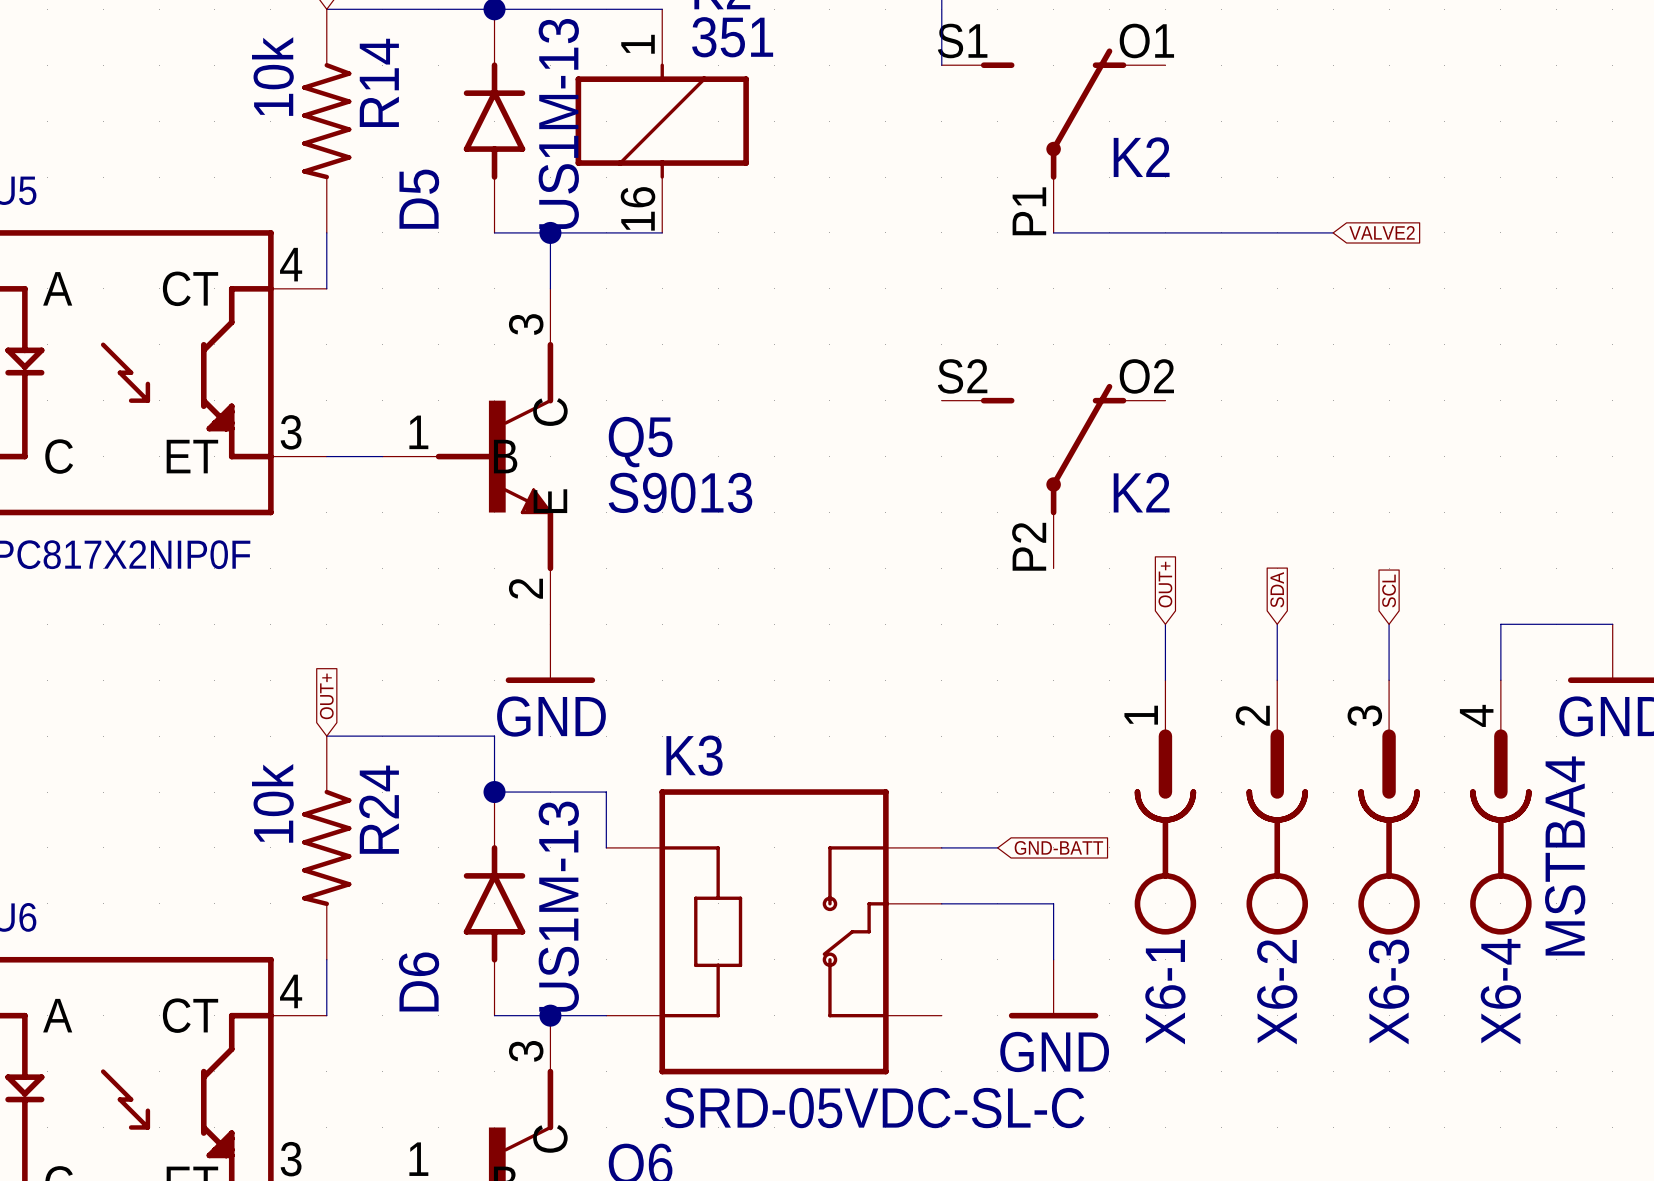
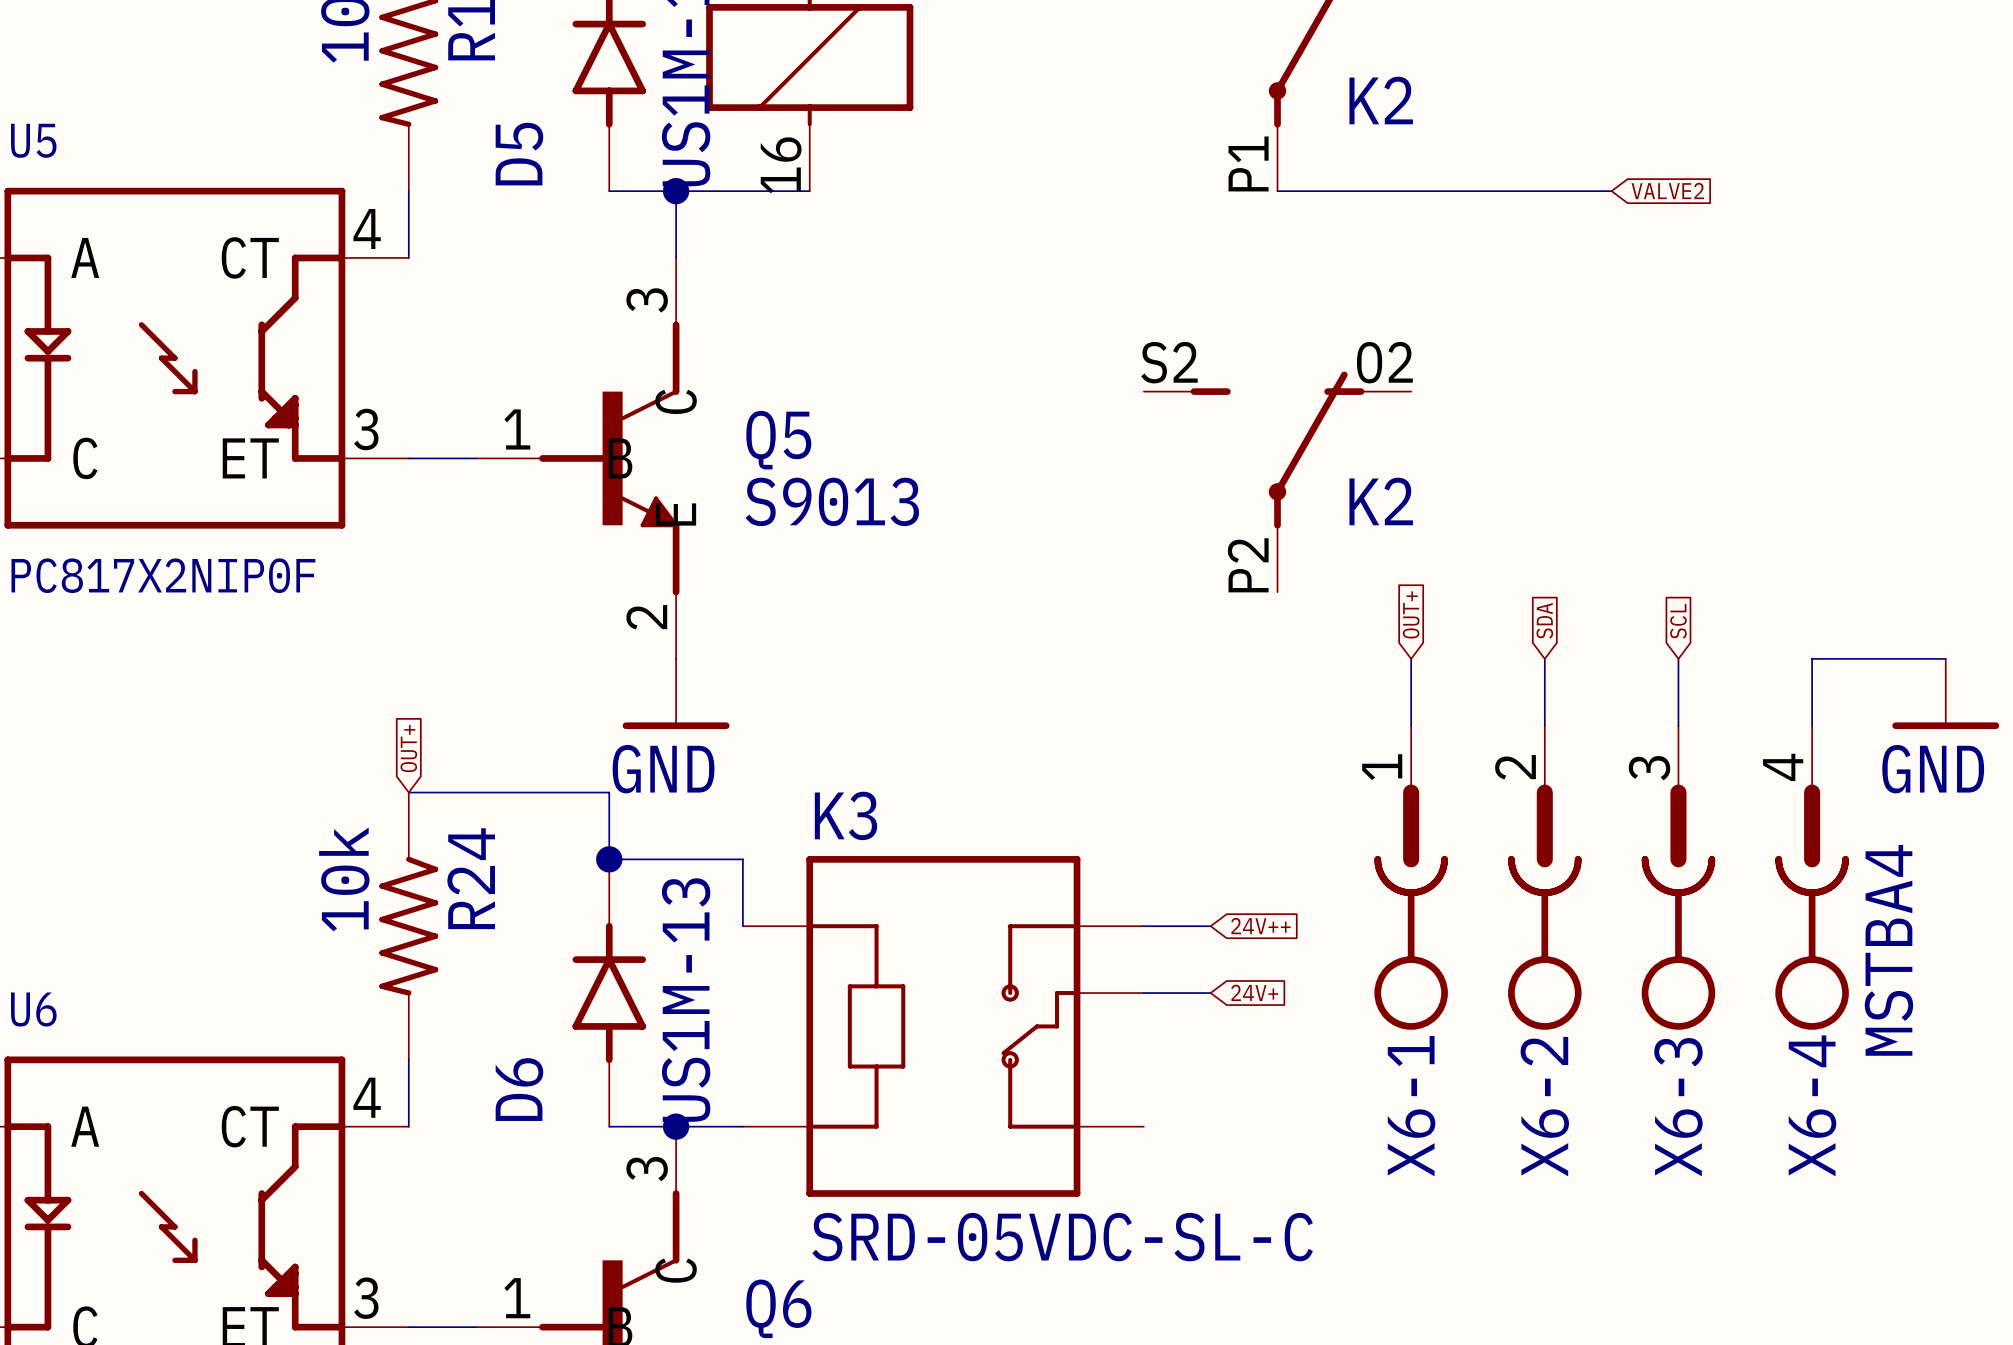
global label: GND-BATT (1058, 847) -> 24V++ (1260, 926)
wire: (997, 903) (1053, 903) (1053, 959) -> none
global label: none -> 24V+ (1254, 992)
power symbol: GND (1053, 989) -> none

